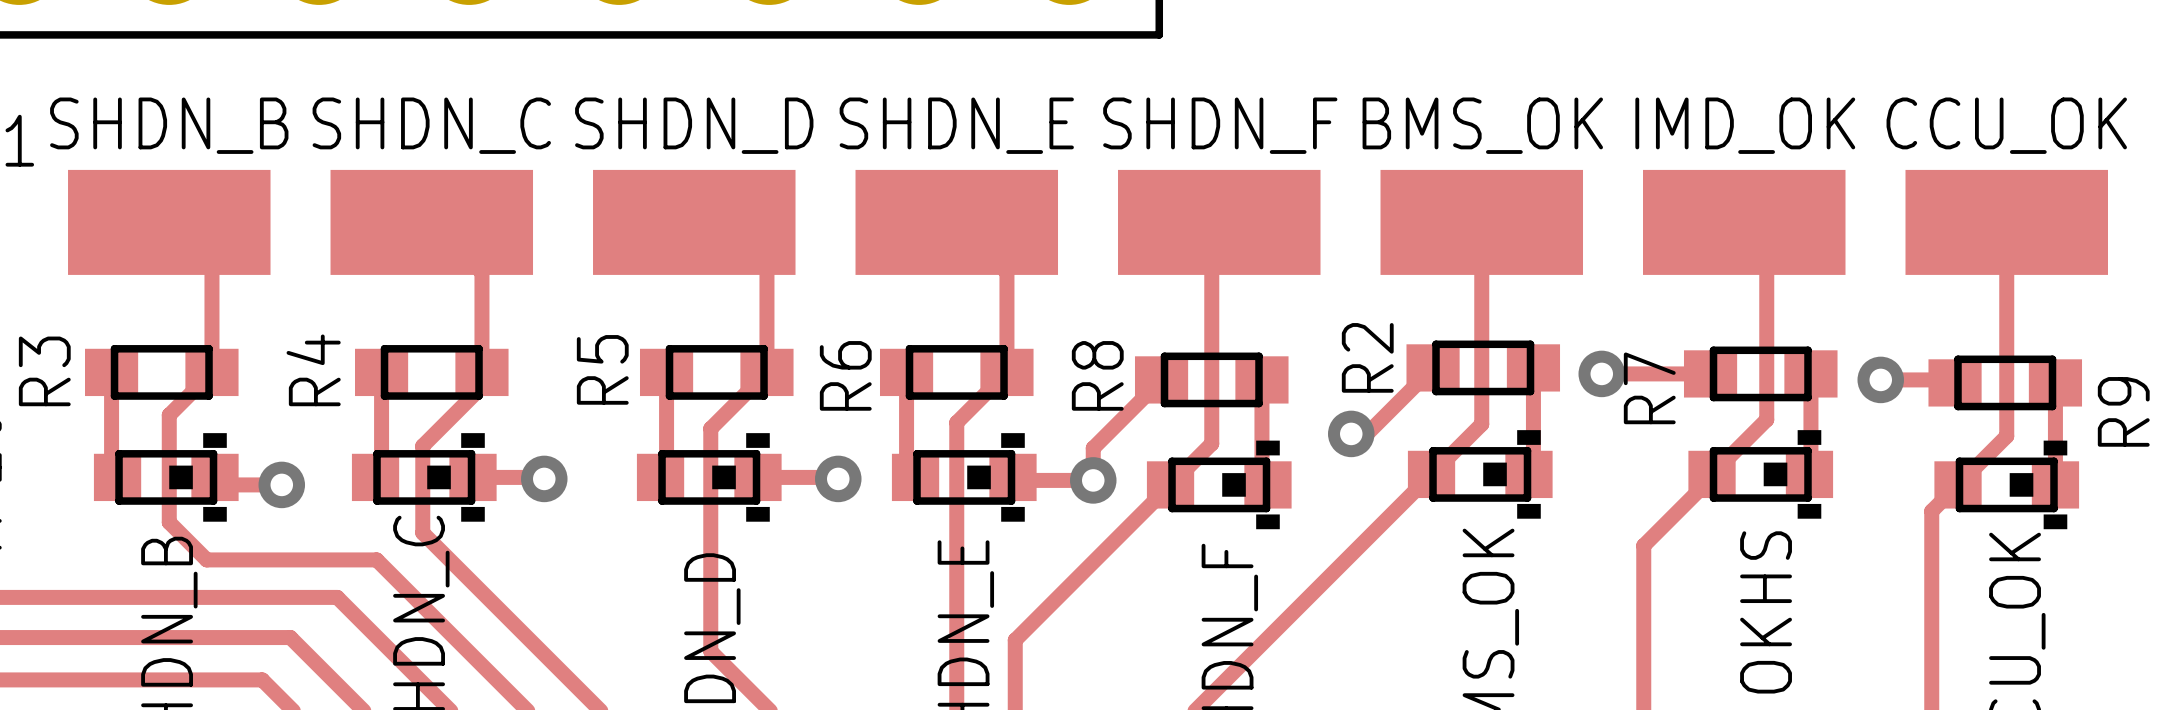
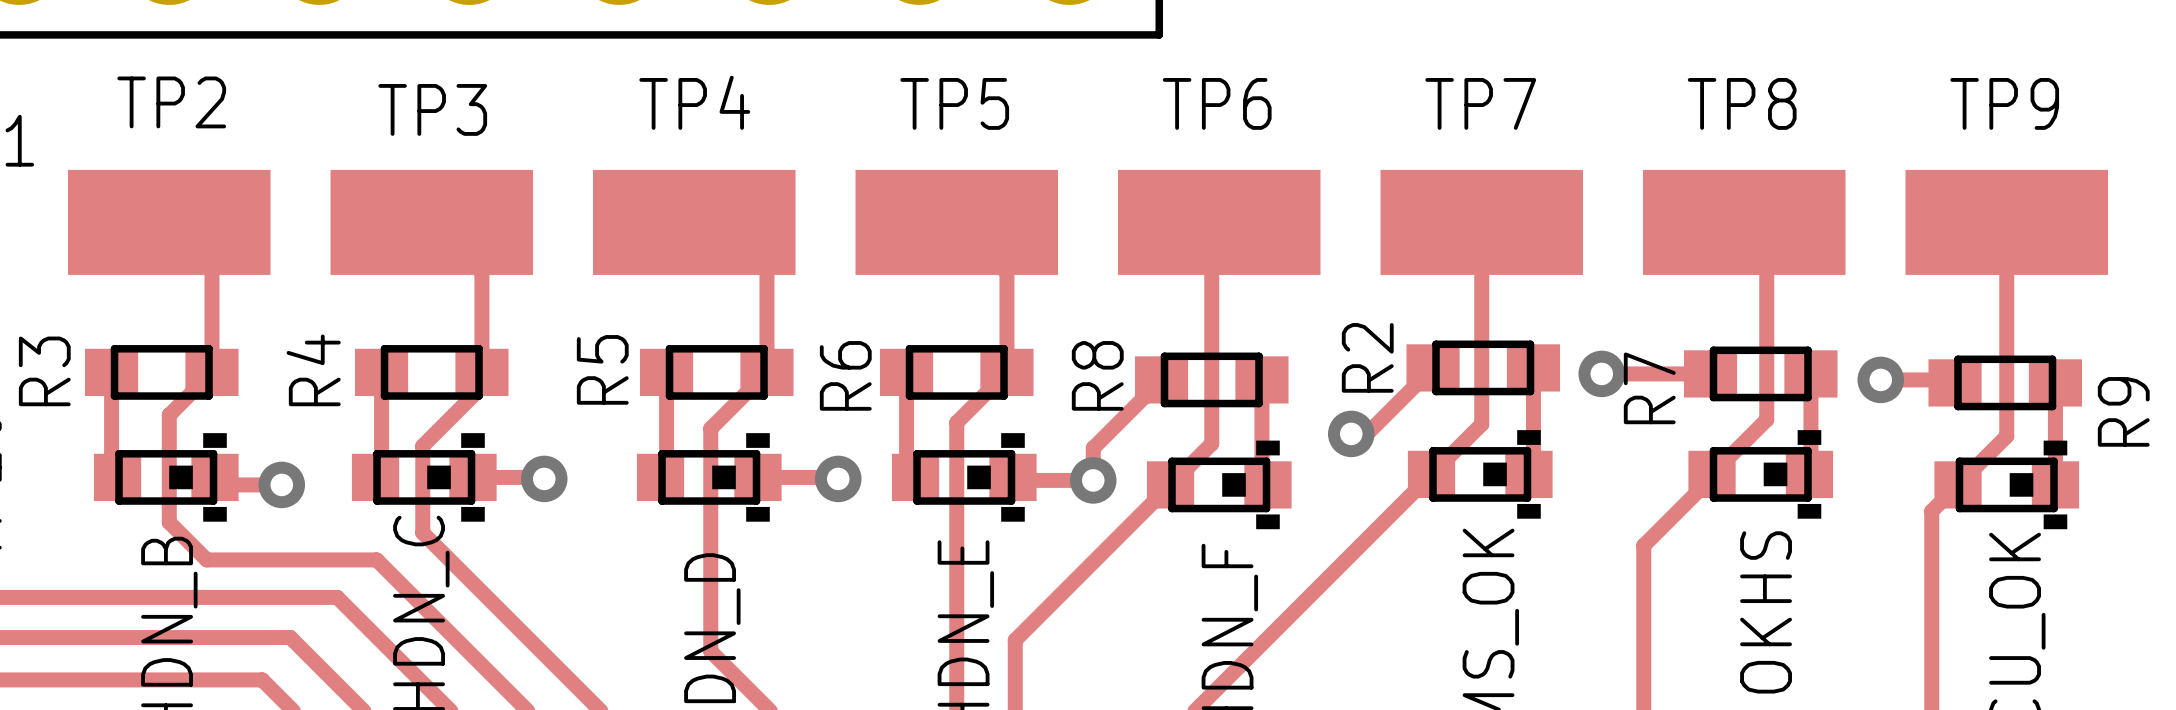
TP2 name: none -> TP2 (171, 102)
TP4 name: none -> TP4 (694, 102)
TP5 name: none -> TP5 (954, 103)
TP6 name: none -> TP6 (1217, 103)
TP7 name: none -> TP7 (1480, 103)
TP8 name: none -> TP8 (1742, 103)
TP9 name: none -> TP9 (2004, 103)
TP3 name: none -> TP3 (432, 109)
TP2 text: SHDN_B (169, 125) -> none
text: SHDN_C (431, 125) -> none
TP4 text: SHDN_D (694, 125) -> none
TP5 text: SHDN_E (956, 125) -> none
TP6 text: SHDN_F (1220, 125) -> none
TP7 text: BMS_OK (1482, 125) -> none
TP8 text: IMD_OK (1745, 125) -> none
TP9 text: CCU_OK (2006, 125) -> none

